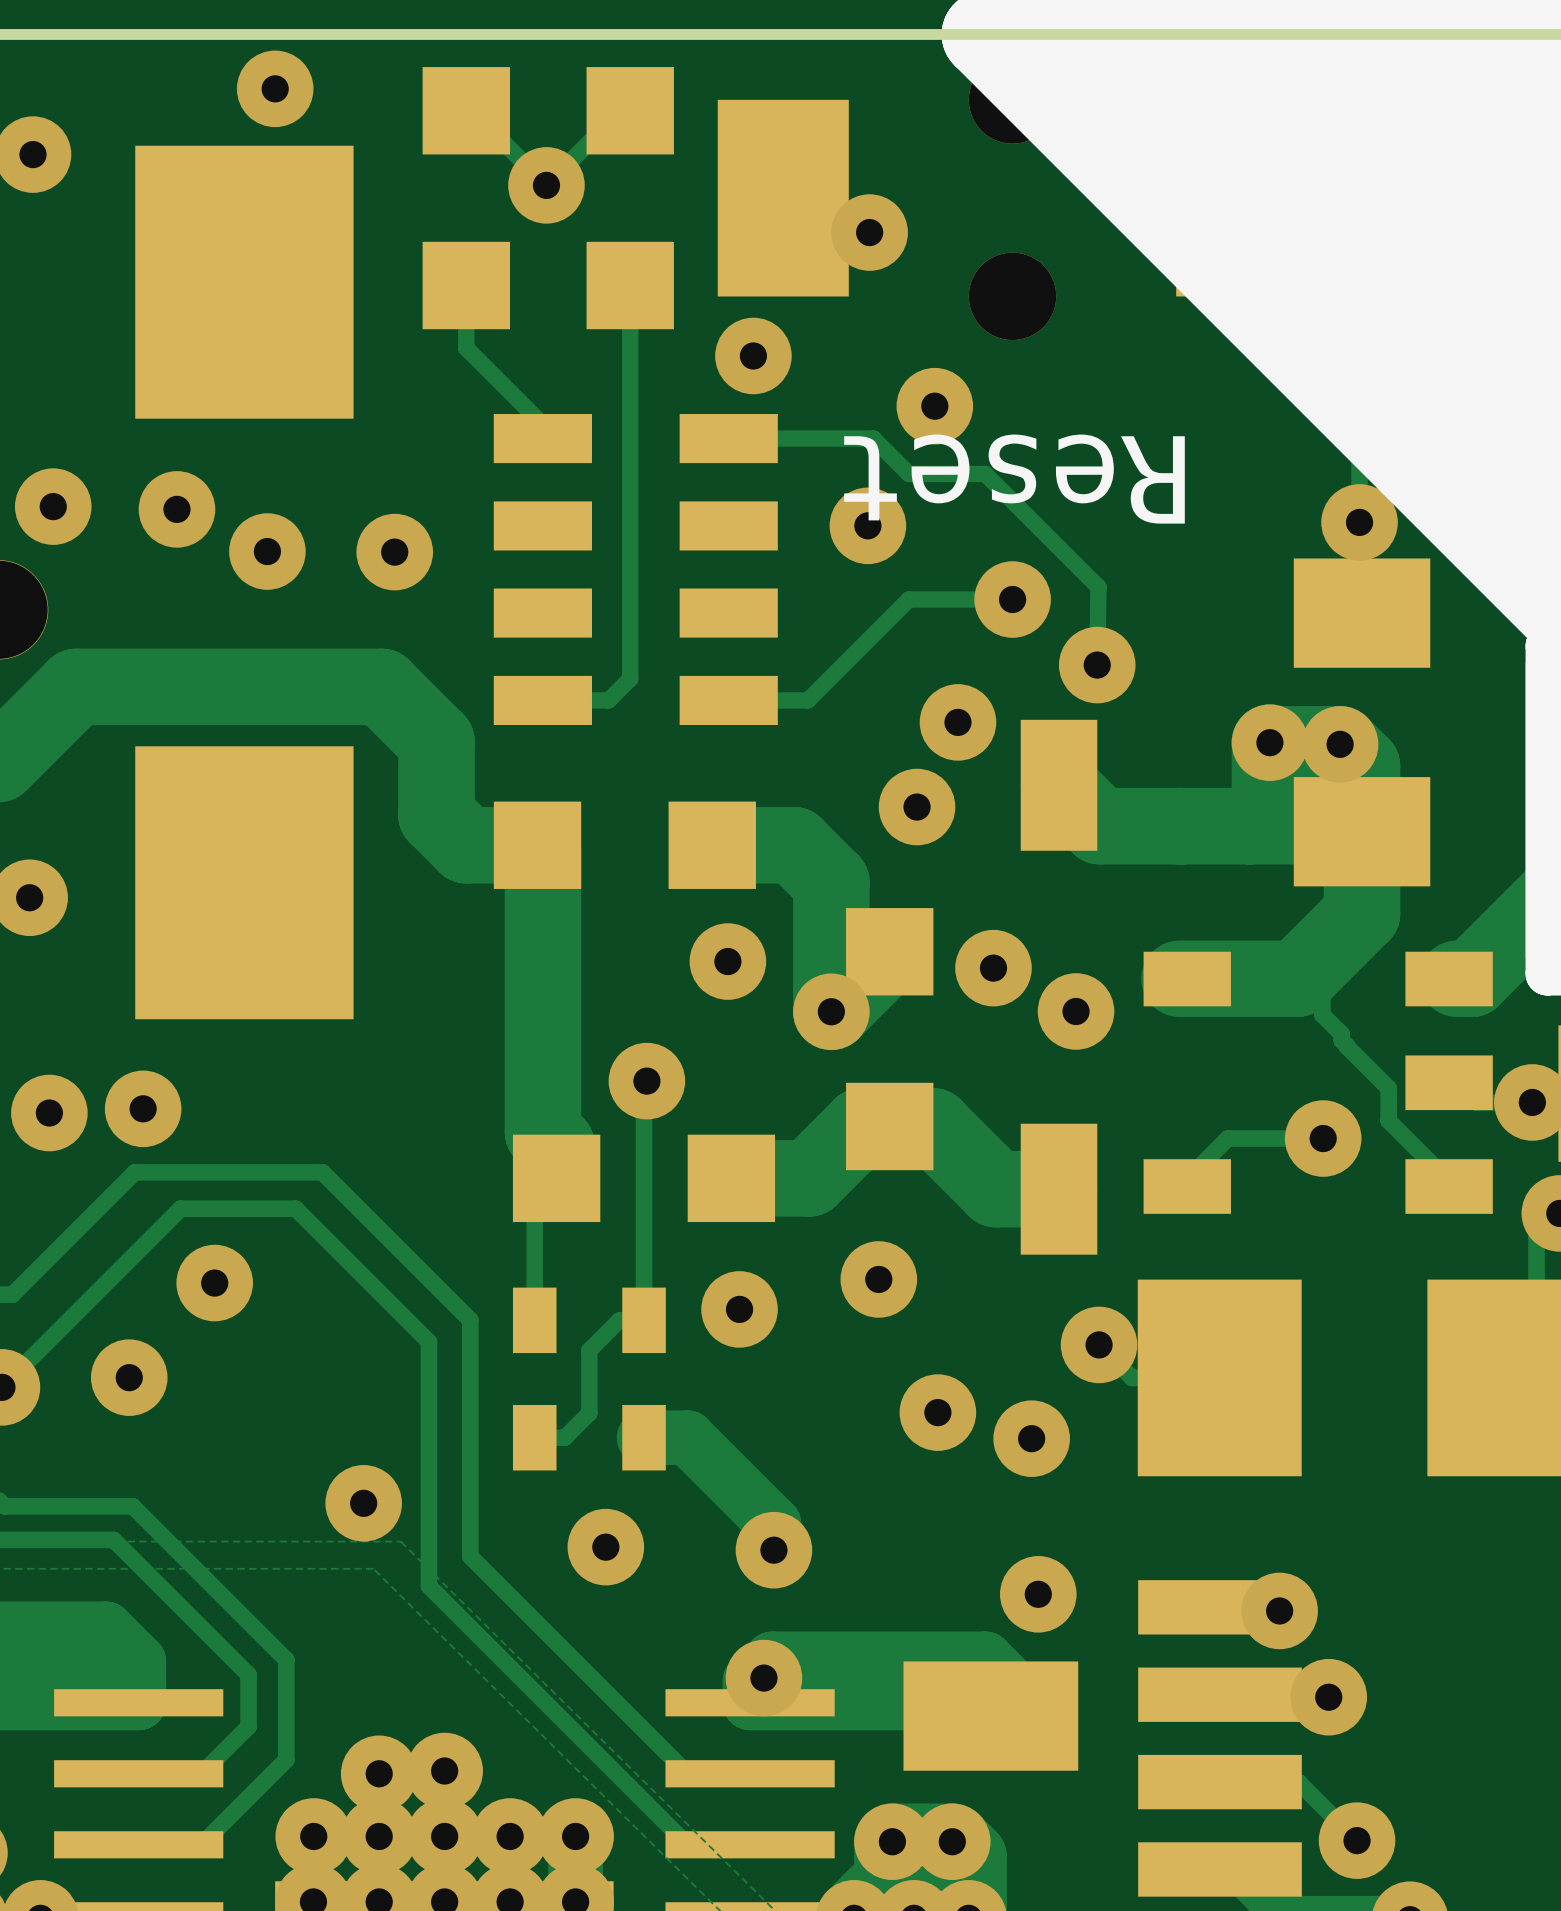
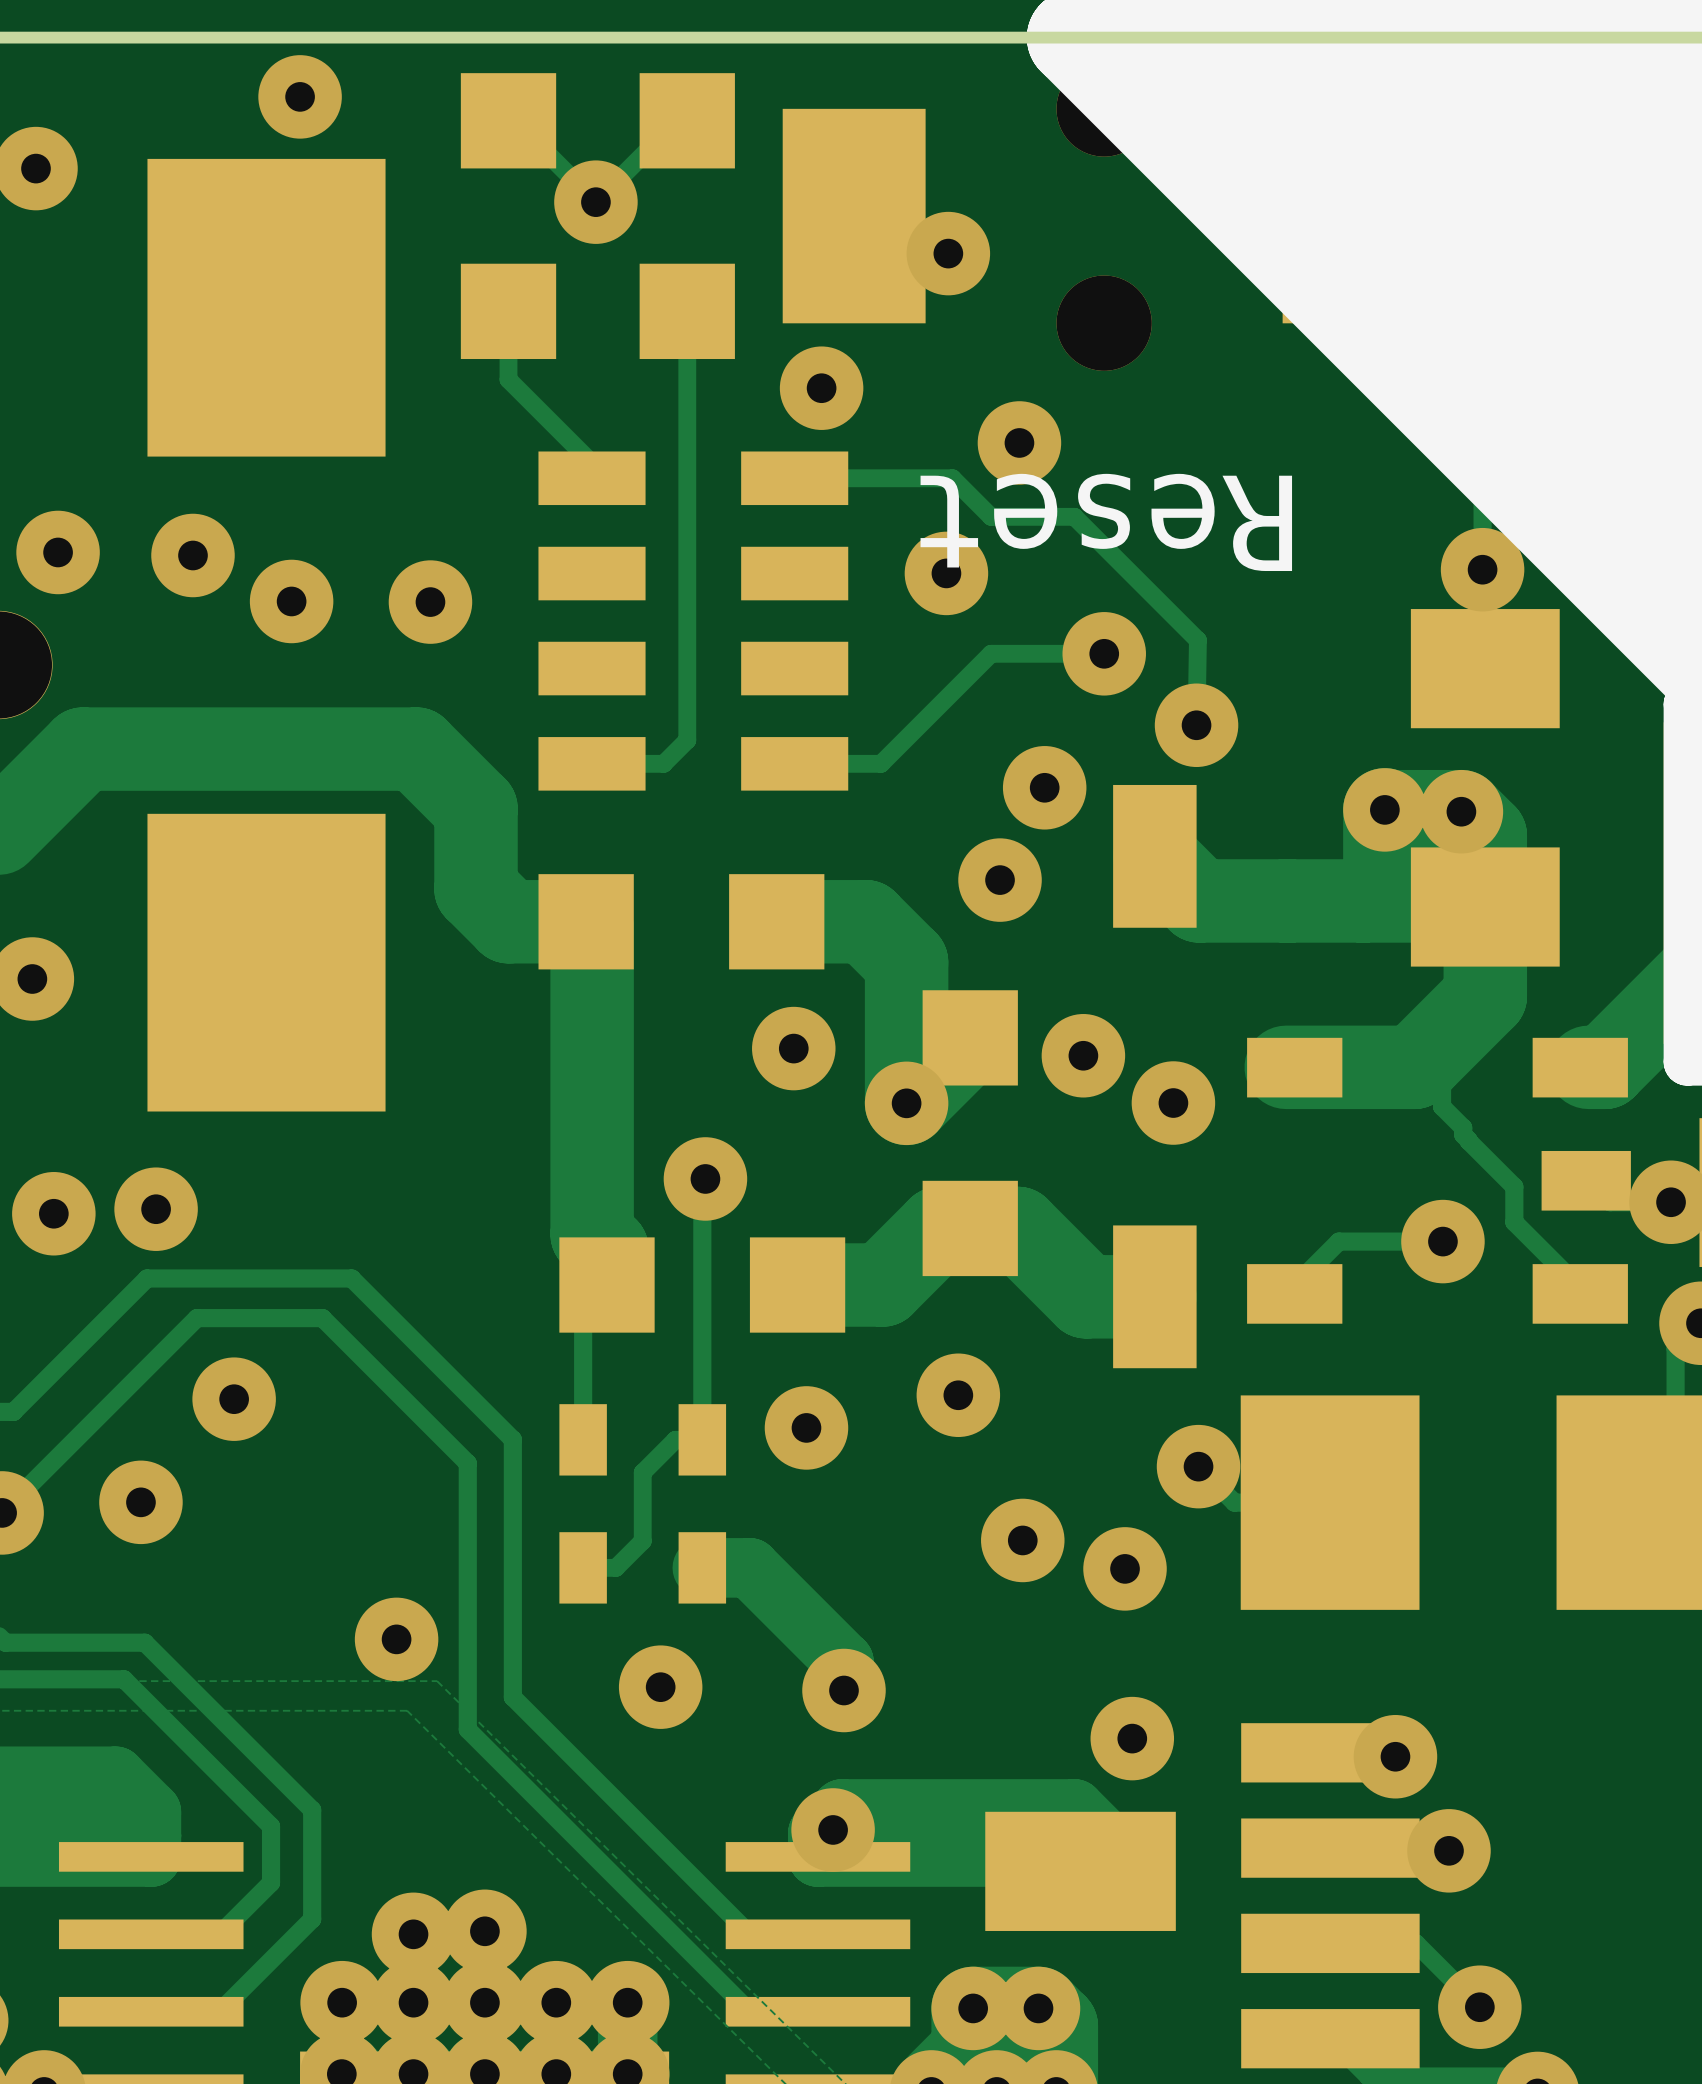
part footprint: [1143, 951, 1493, 1214] -> [1247, 1037, 1631, 1324]

